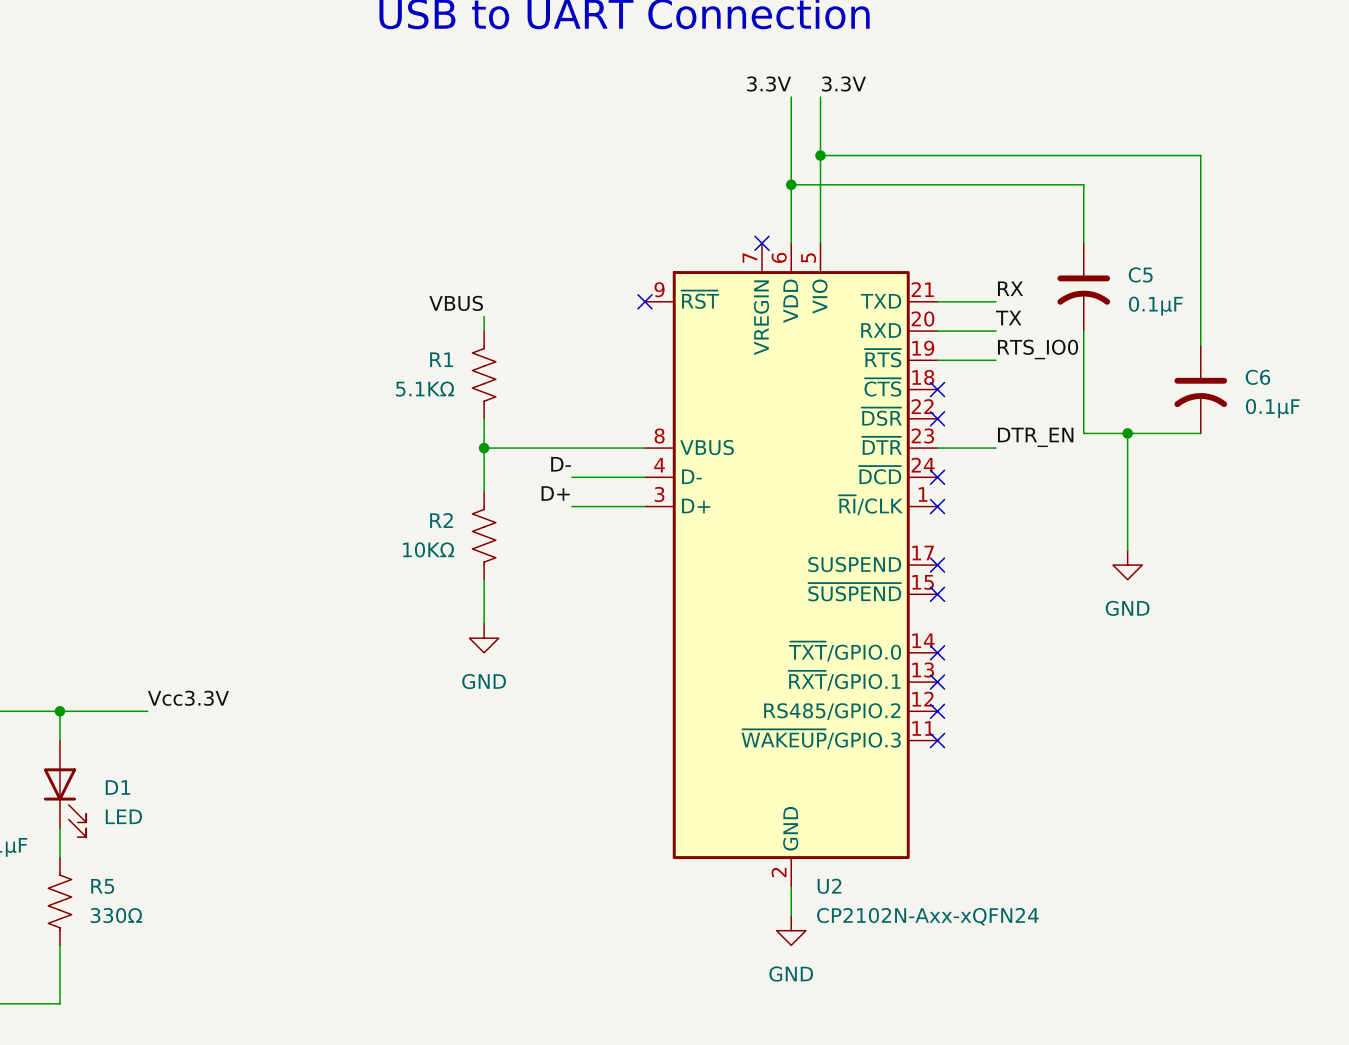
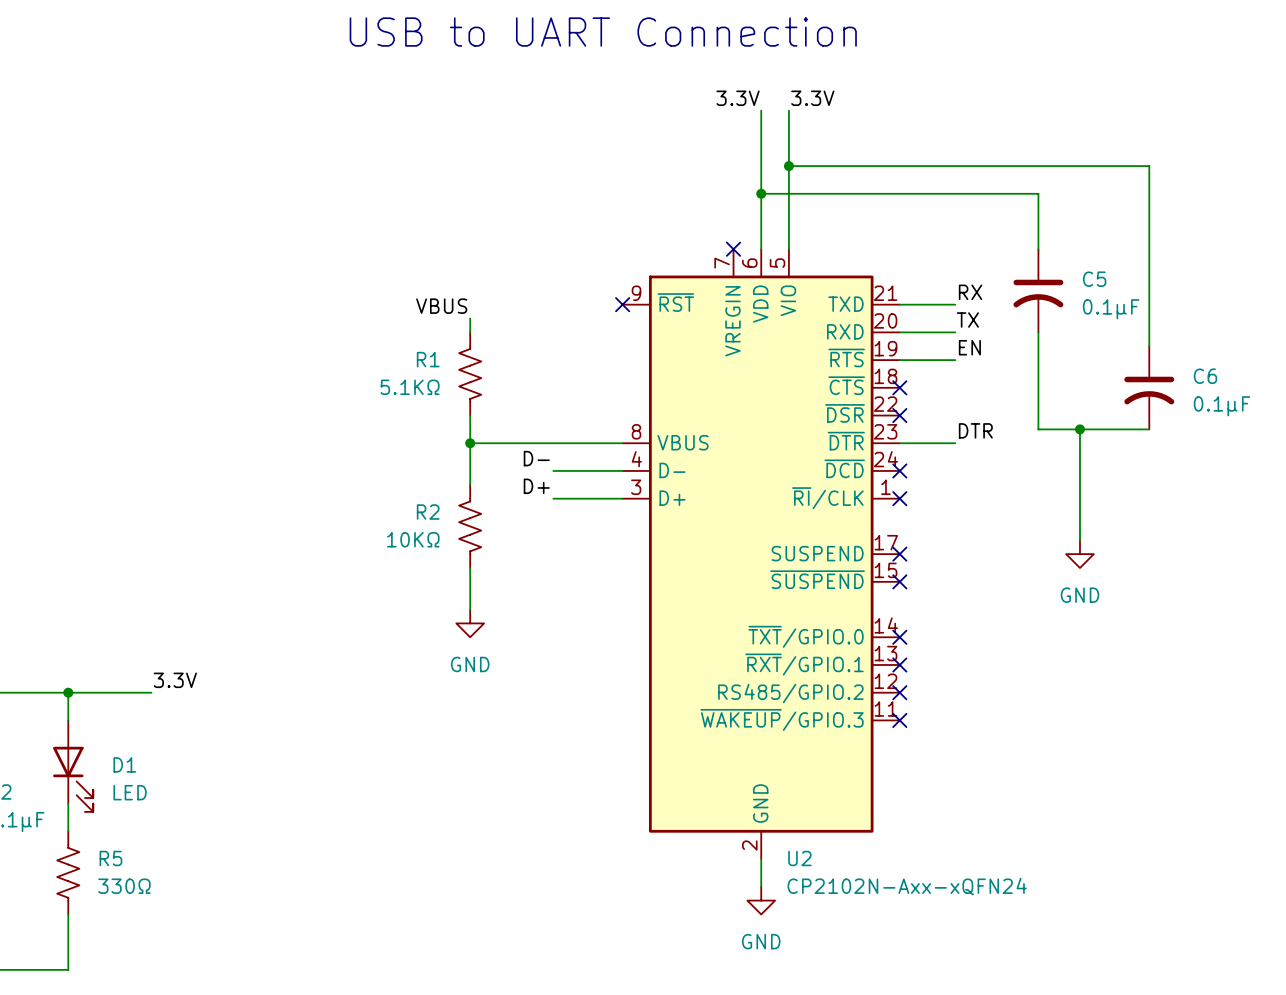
label: RTS_IO0 (1038, 349) -> EN (969, 347)
label: DTR_EN (1035, 437) -> DTR (975, 430)
label: Vcc3.3V (188, 698) -> 3.3V (175, 680)

